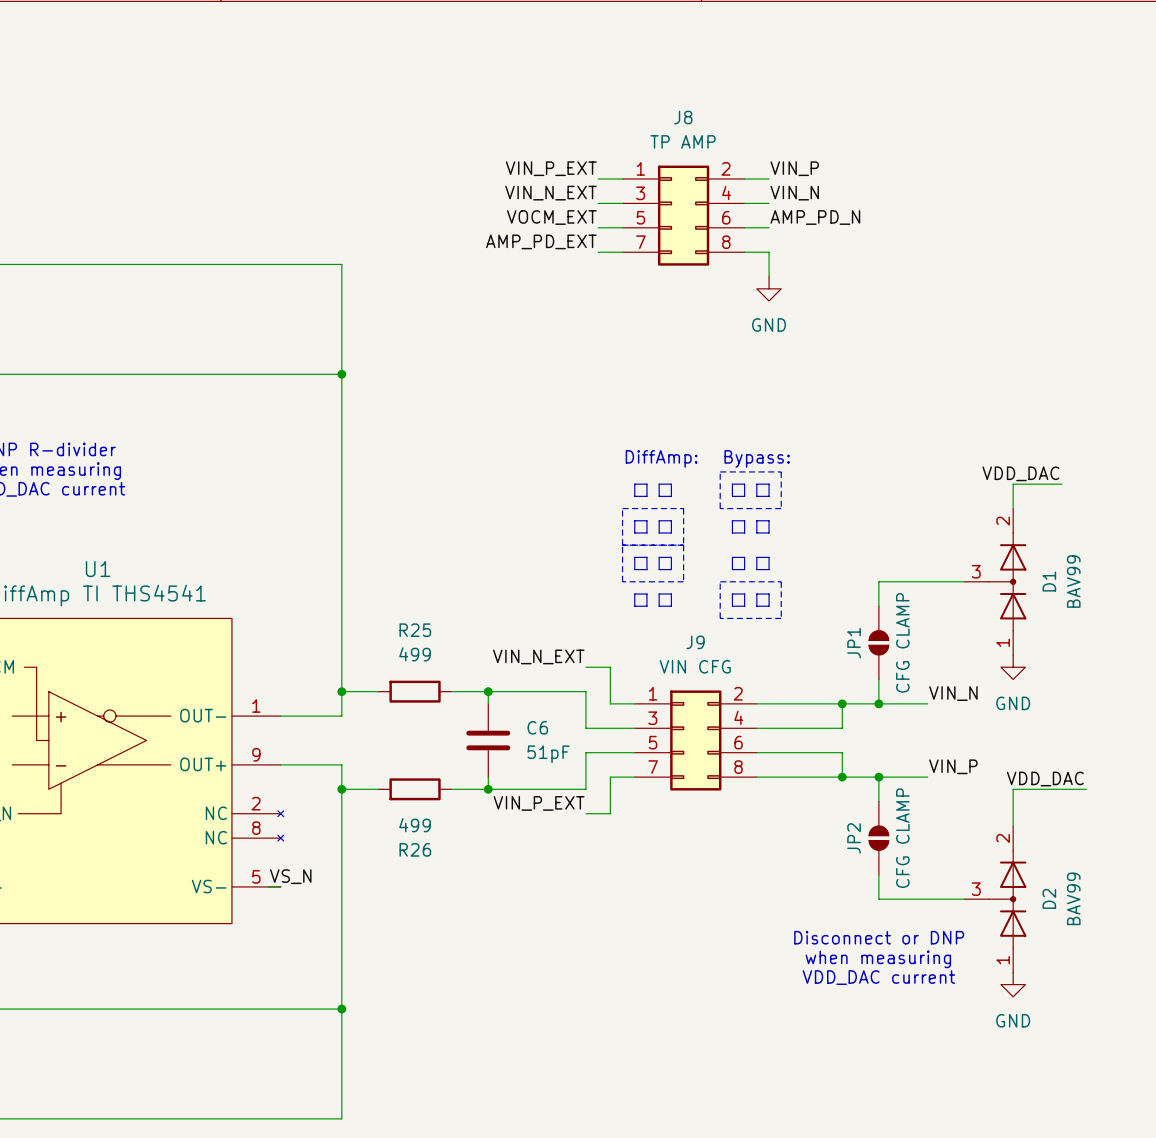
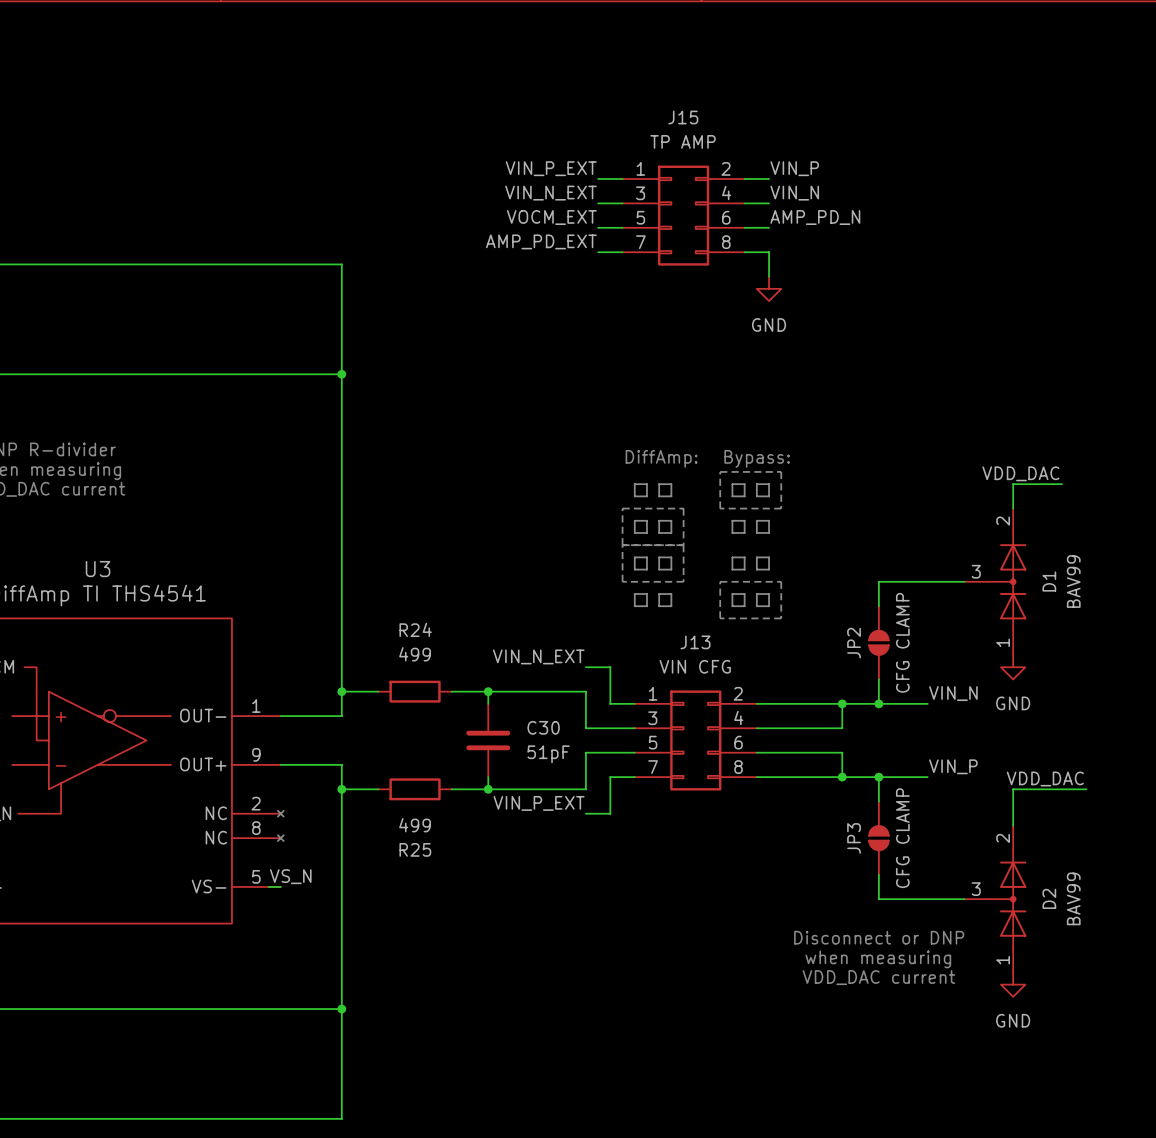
J8 name: J8 (683, 117) -> J15 (683, 117)
U1 name: U1 (98, 569) -> U3 (98, 569)
R25 name: R25 (415, 630) -> R24 (415, 629)
J9 name: J9 (695, 642) -> J13 (695, 642)
JP1 name: JP1 (854, 643) -> JP2 (854, 643)
C6 name: C6 (537, 727) -> C30 (543, 727)
JP2 name: JP2 (854, 838) -> JP3 (854, 838)
R26 name: R26 (415, 849) -> R25 (415, 849)

